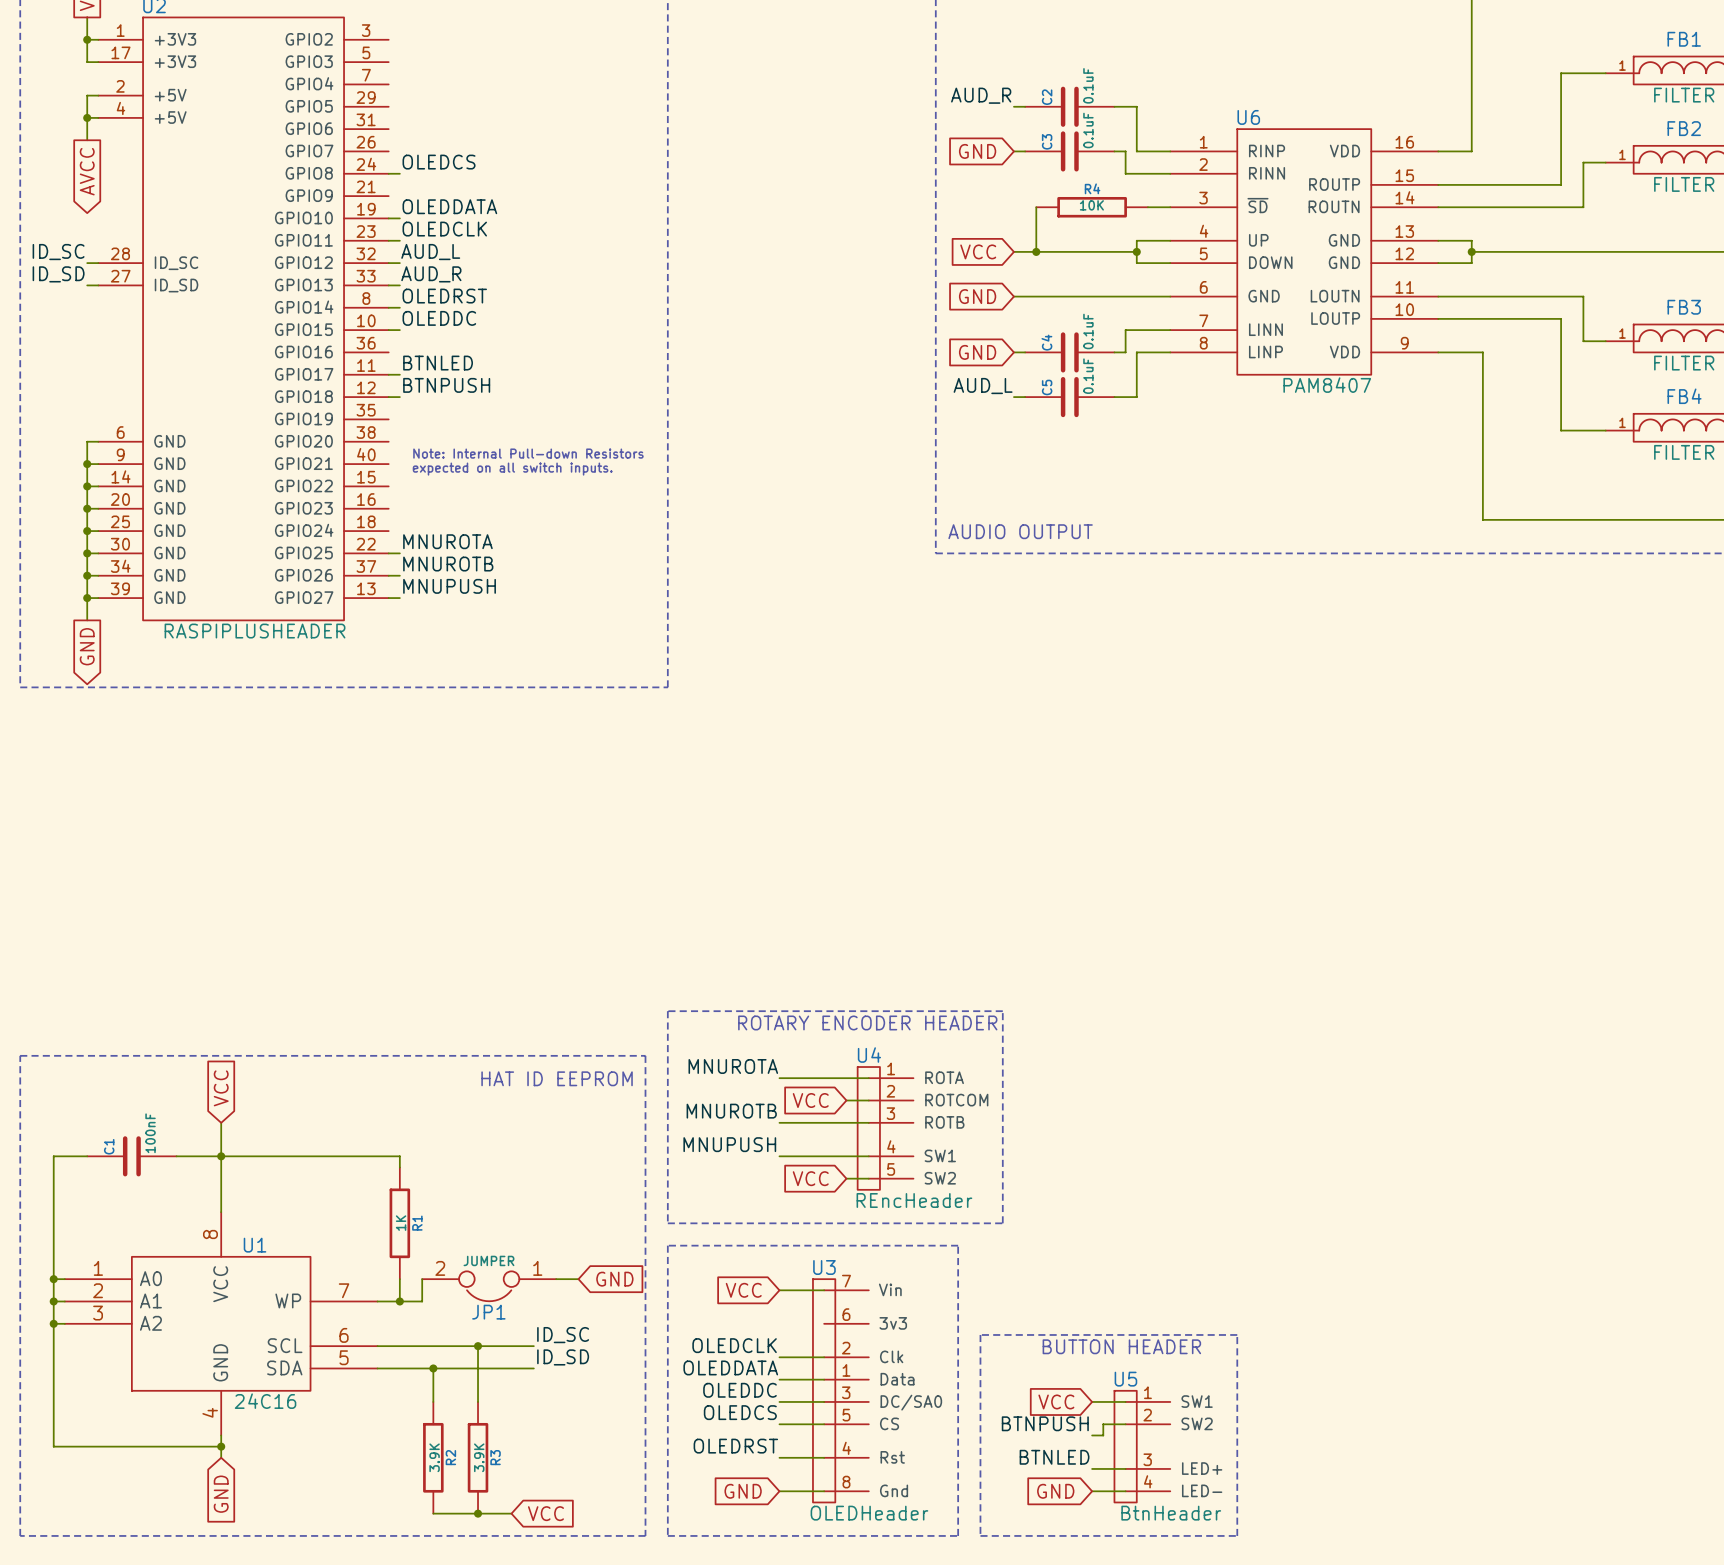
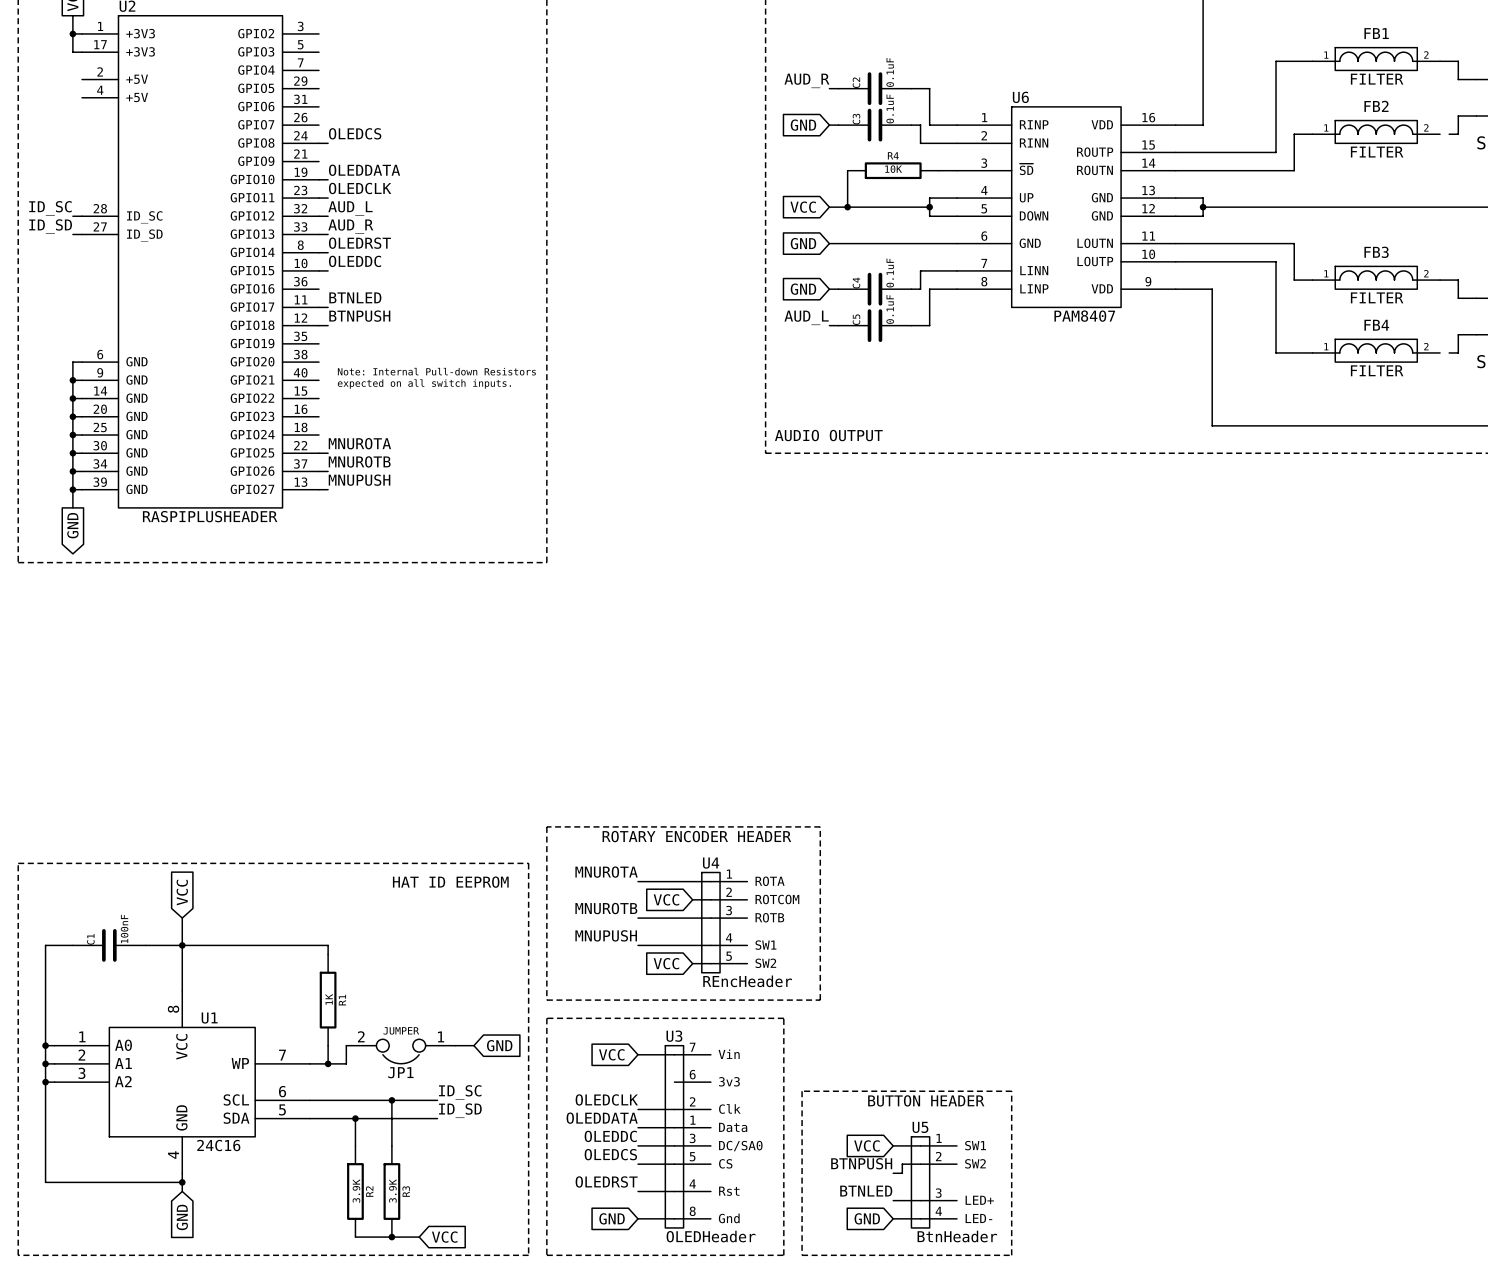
wire: (98, 95) (87, 95) (87, 140) -> none
wire: (87, 117) (98, 117) -> none
junction: (87, 117) -> none
global label: AVCC (87, 171) -> none

